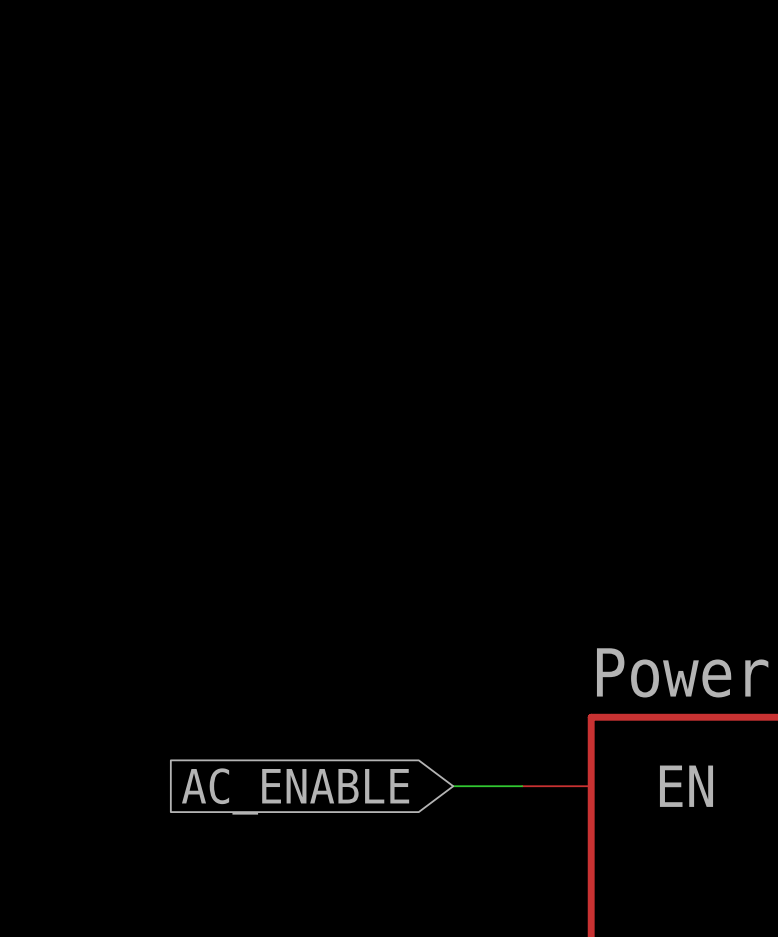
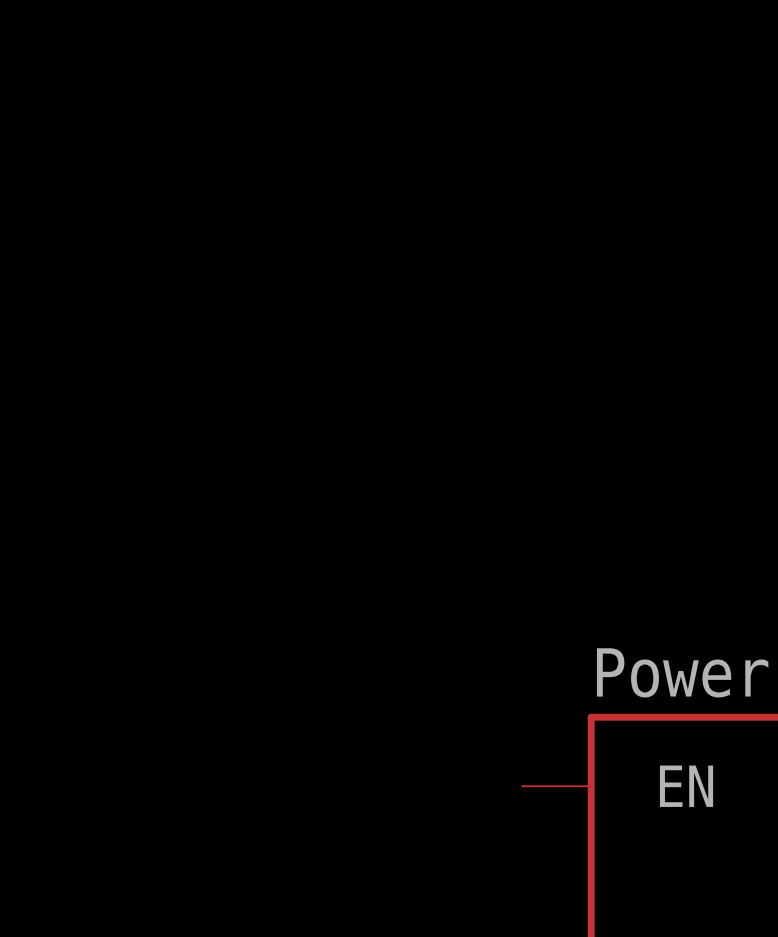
wire: (453, 786) (522, 786) -> none
global label: AC_ENABLE (295, 791) -> none

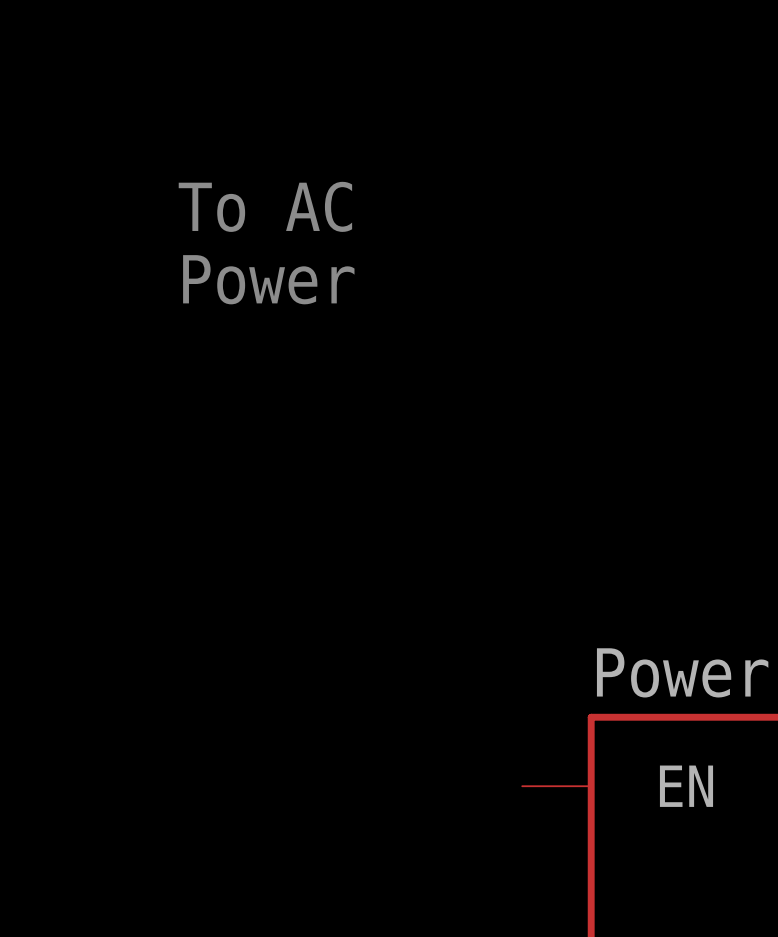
text: none -> To AC (265, 206)
text: none -> Power (268, 279)

